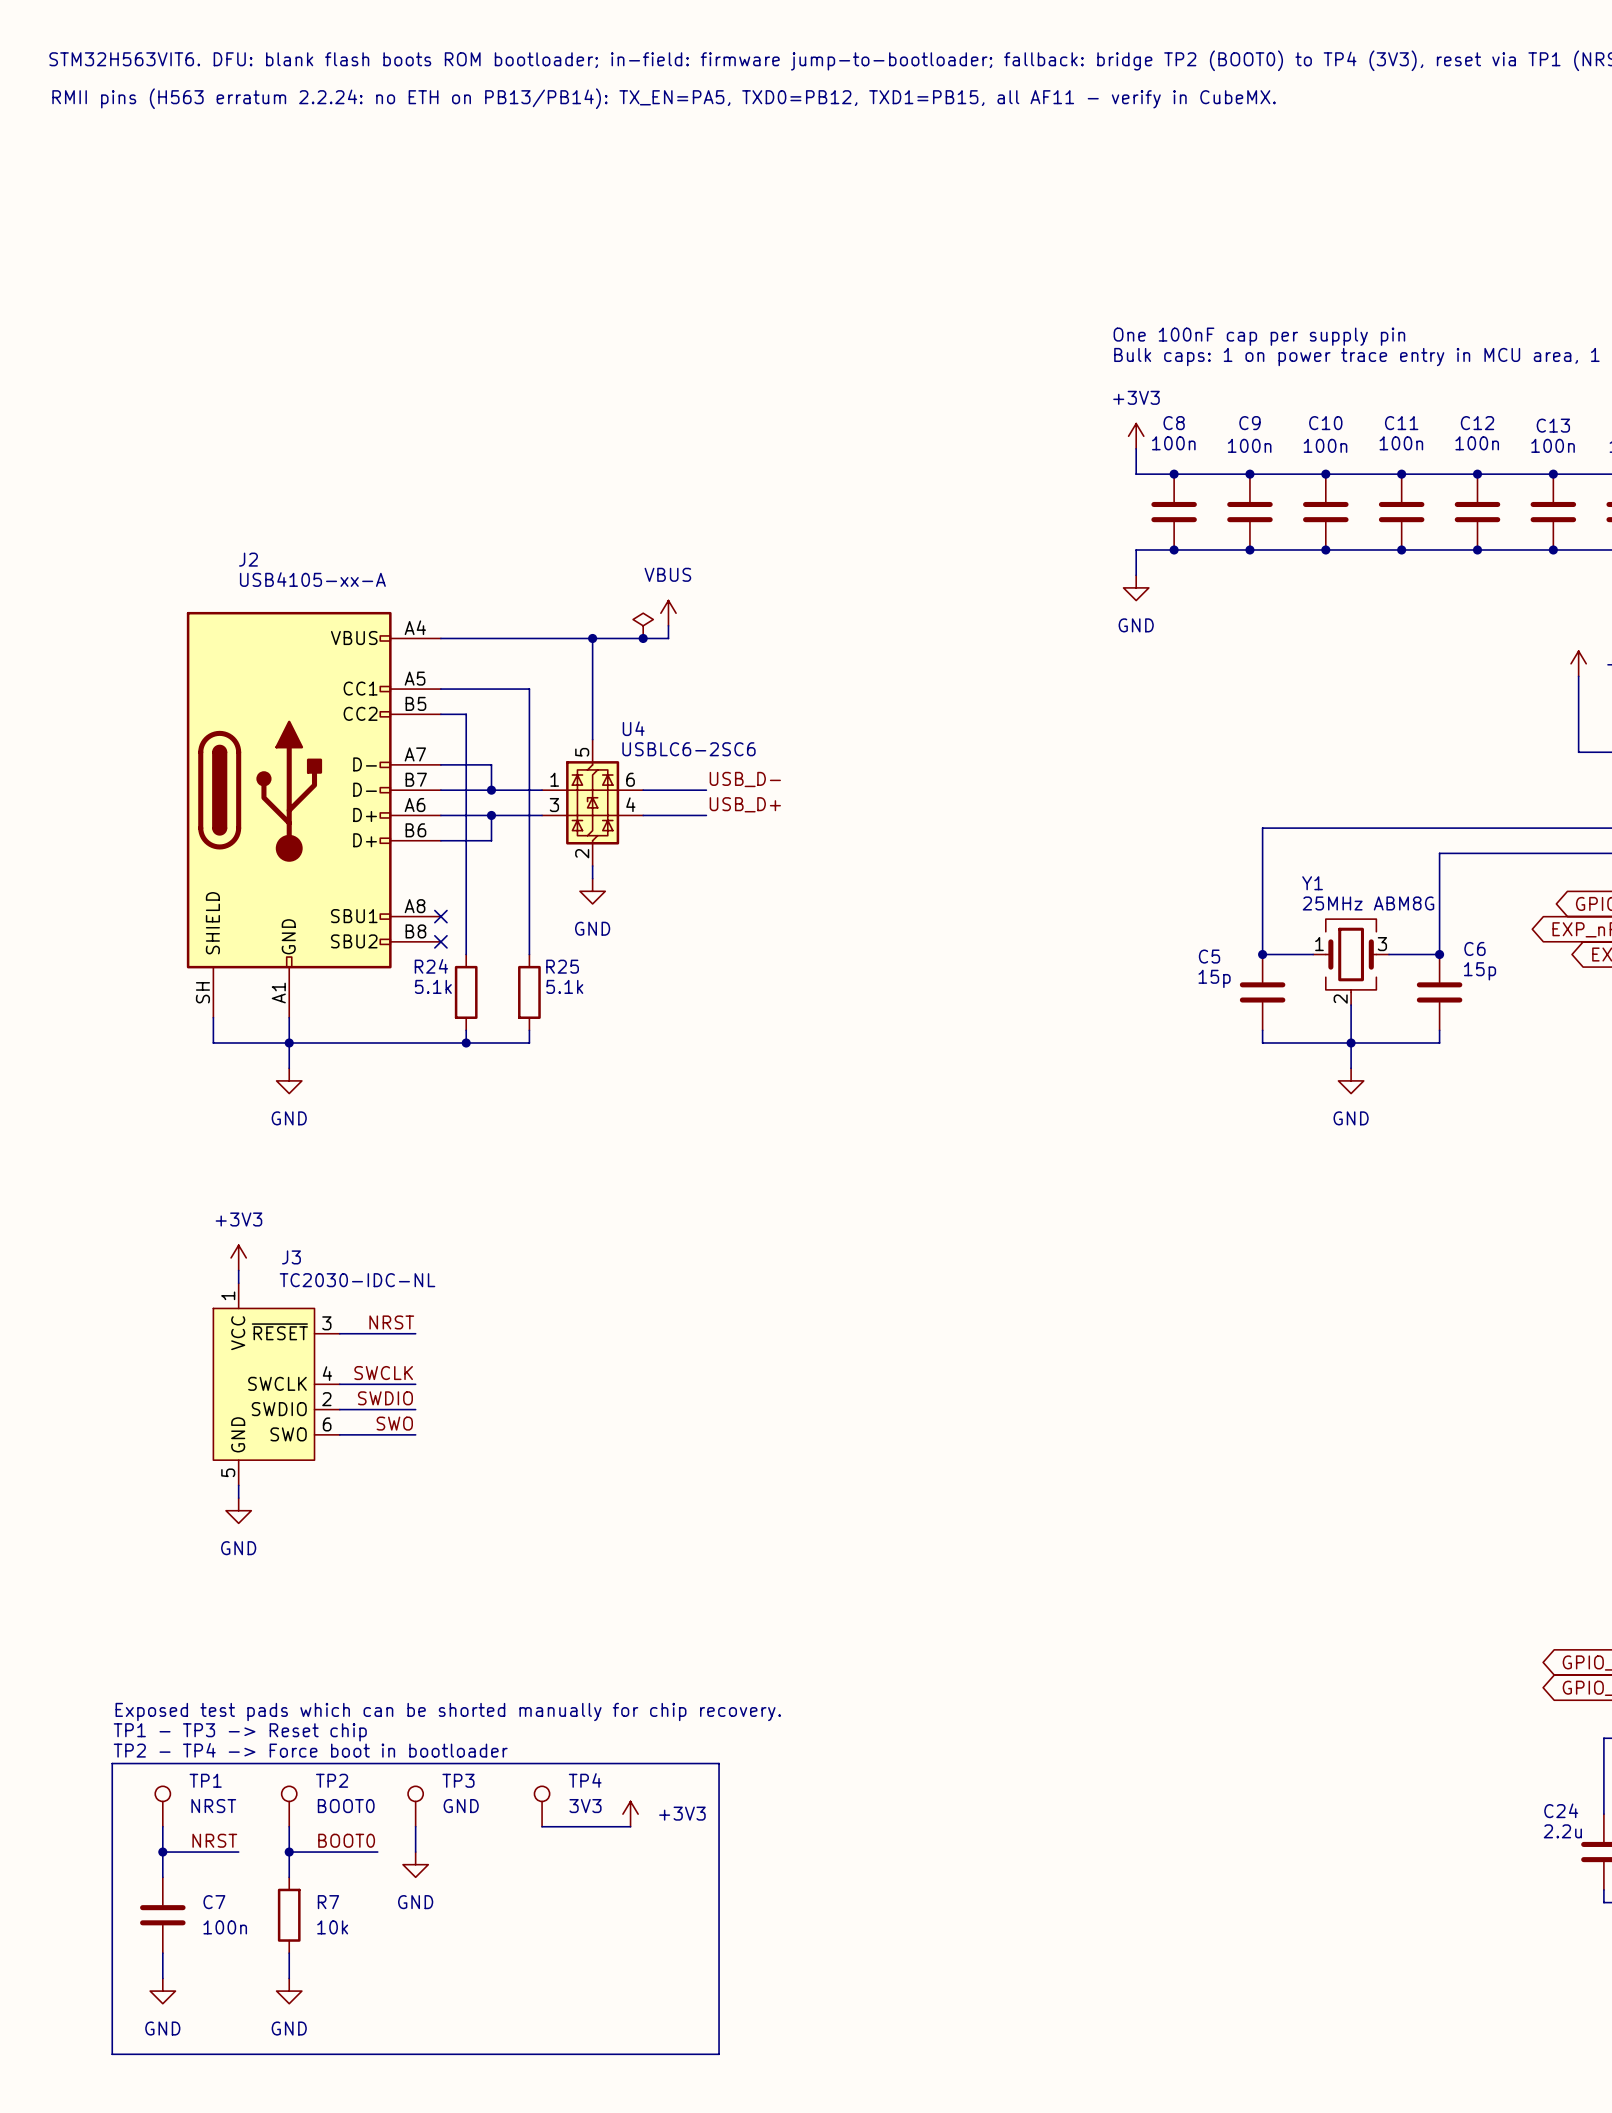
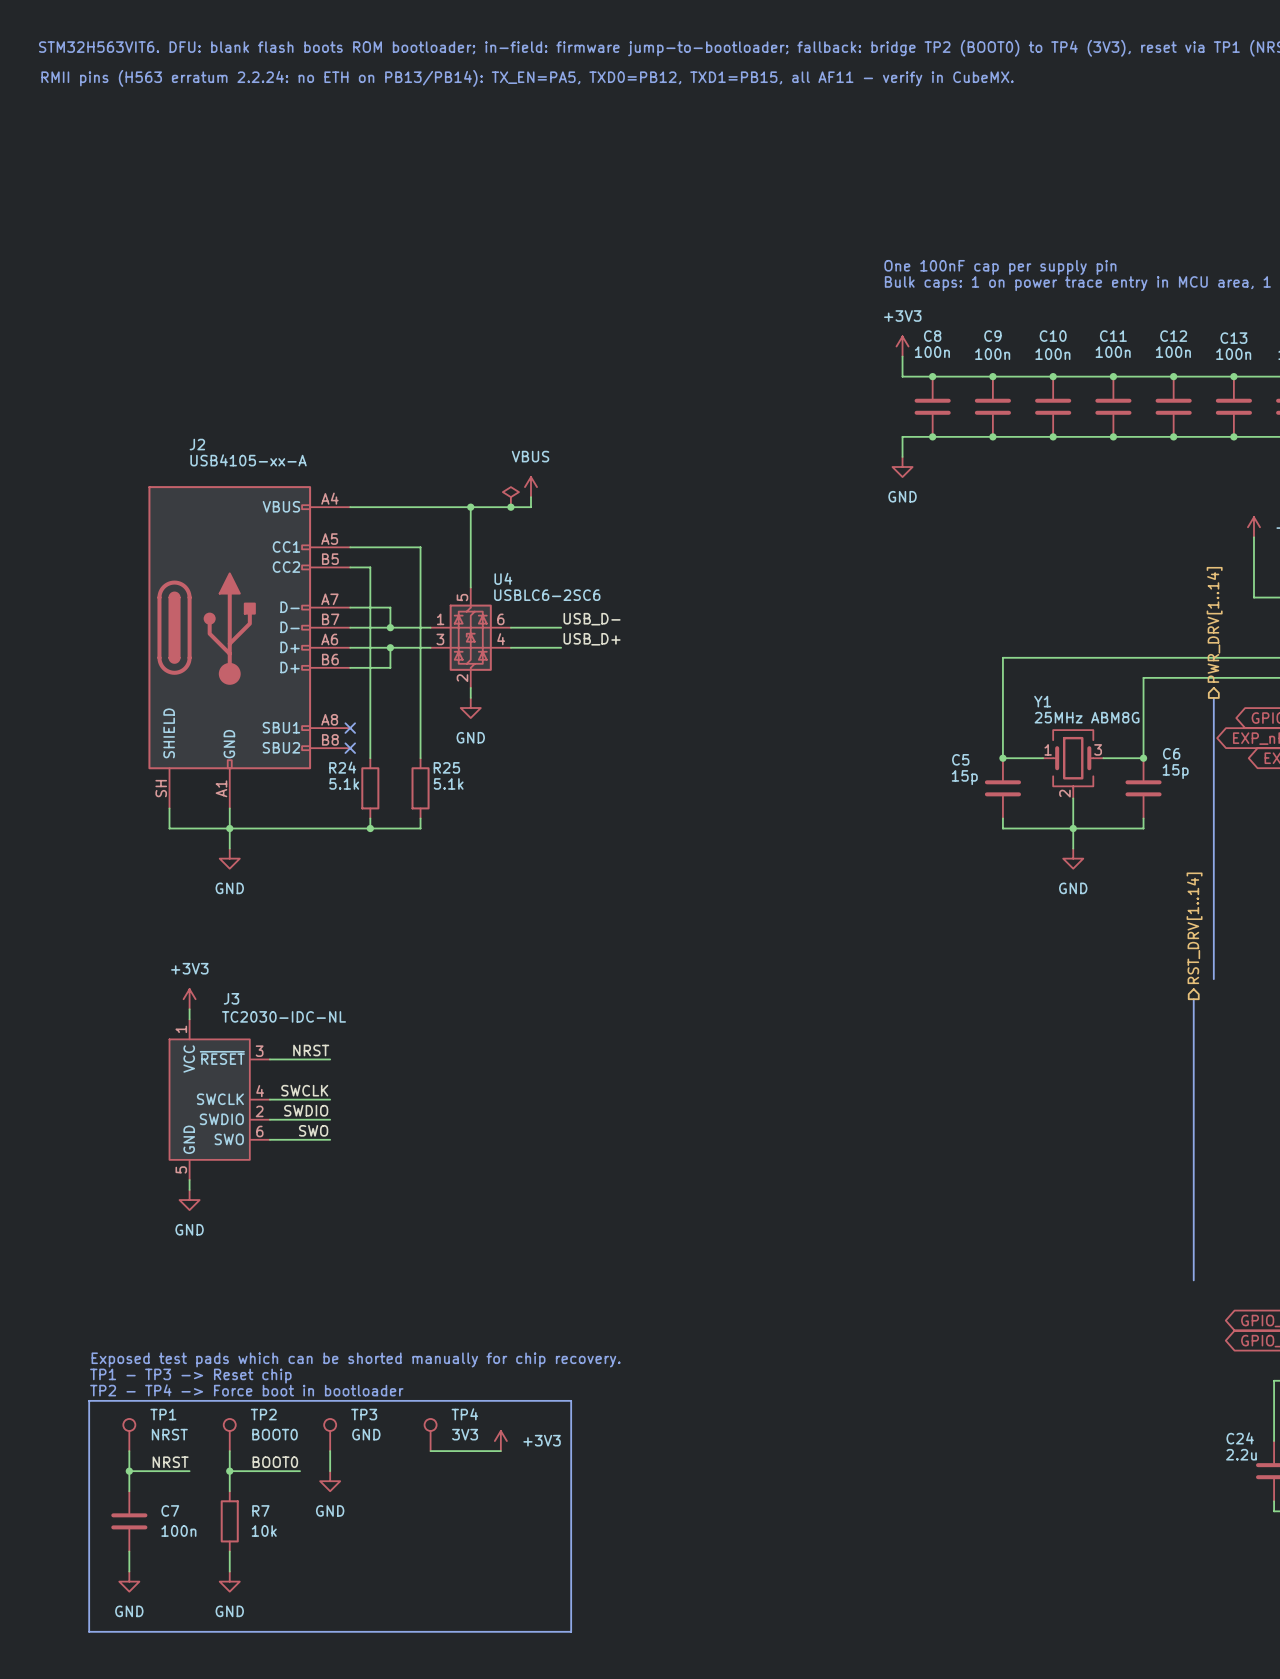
hierarchical label: none -> PWR_DRV[1..14] (1214, 624)
bus: none -> (1213, 697) (1213, 979)
hierarchical label: none -> RST_DRV[1..14] (1194, 928)
bus: none -> (1193, 999) (1193, 1280)

